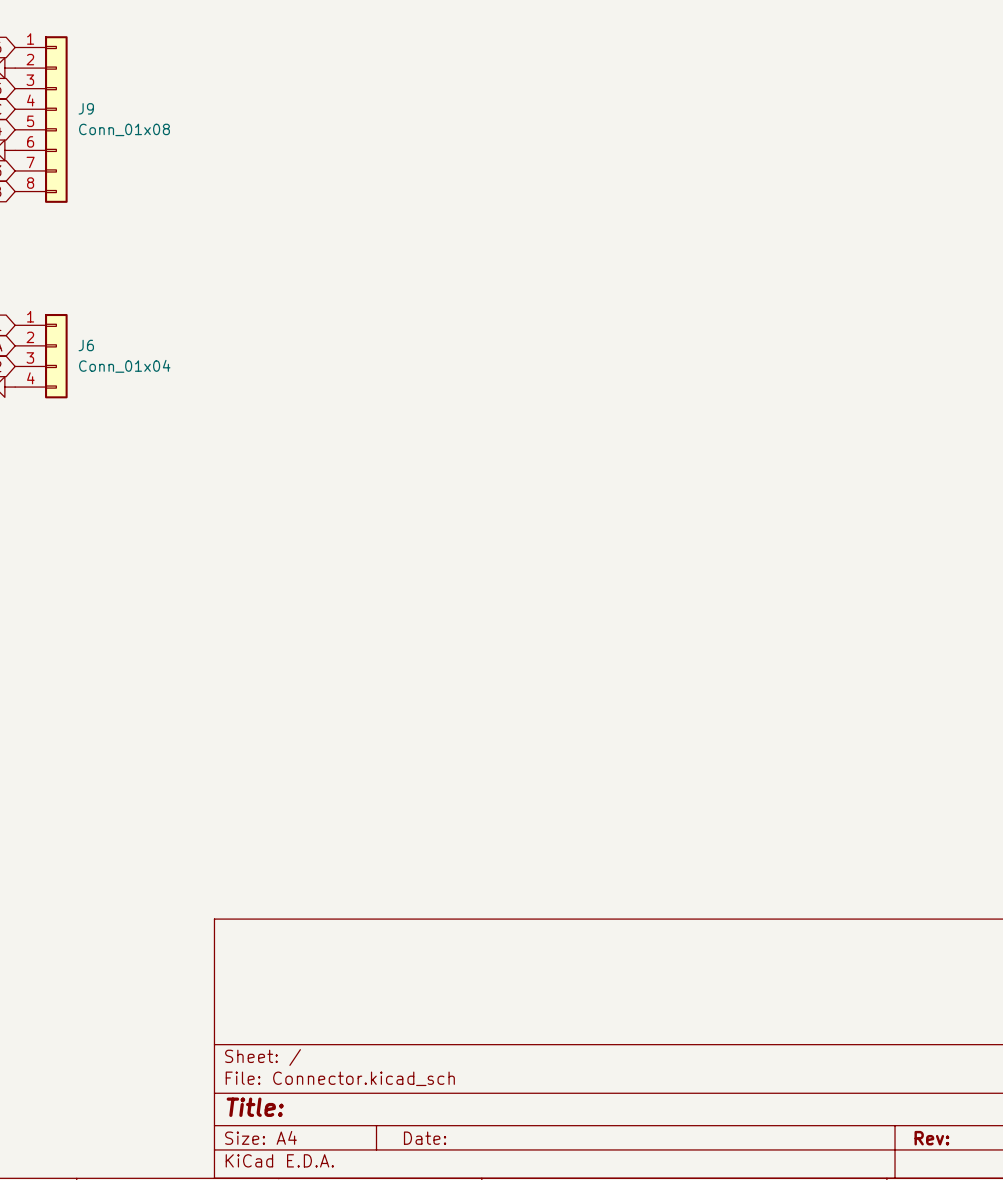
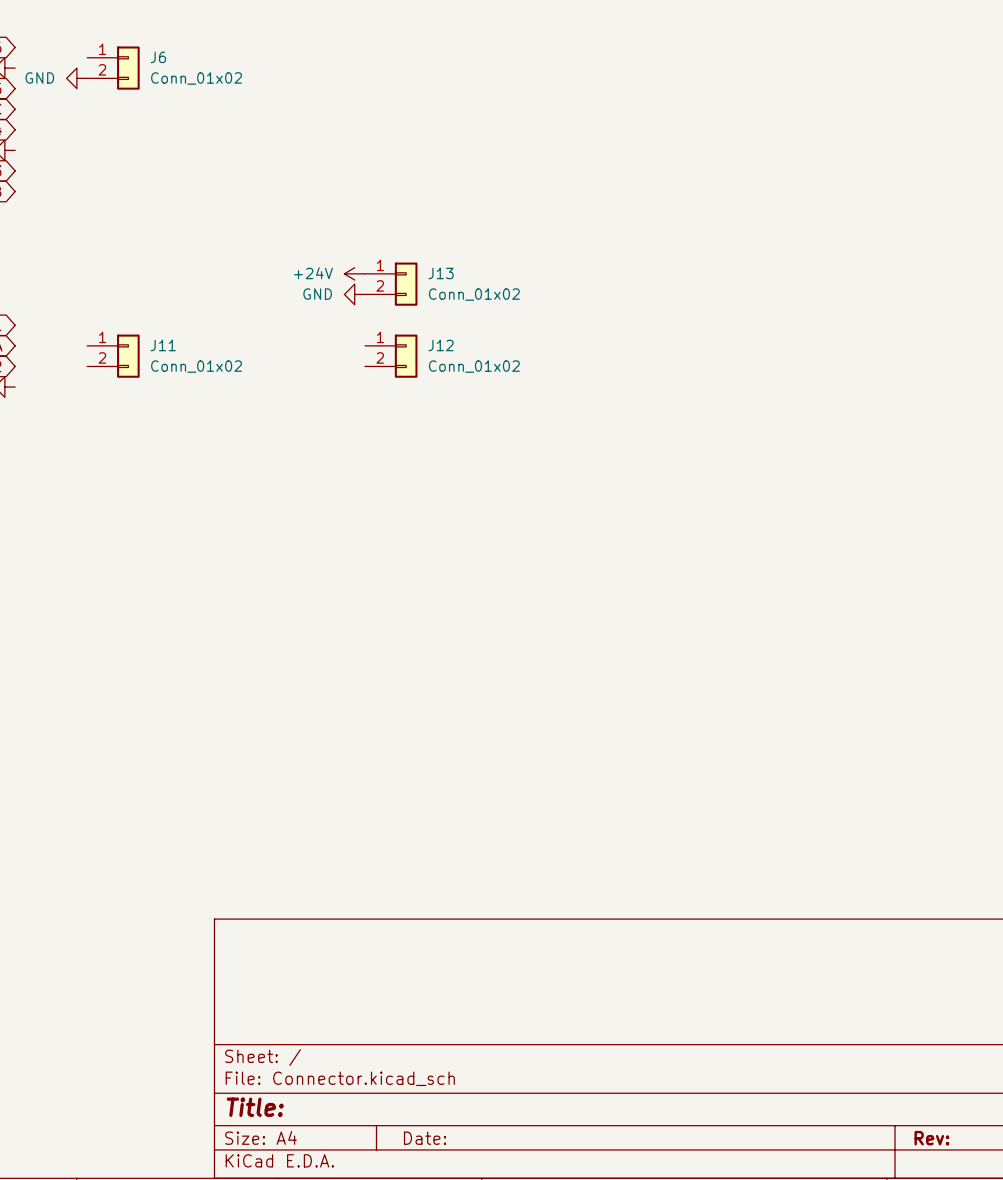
power symbol: none -> GND (76, 78)
J9: Conn_01x08 (41, 119) -> none
power symbol: none -> +24V (354, 273)
J13: none -> Conn_01x02 (391, 284)
power symbol: none -> GND (354, 294)
J6 symbol: [15, 313, 68, 399] -> [87, 46, 140, 90]
J11: none -> Conn_01x02 (113, 356)
J12: none -> Conn_01x02 (391, 356)
J6 value: Conn_01x04 (124, 366) -> Conn_01x02 (196, 78)

